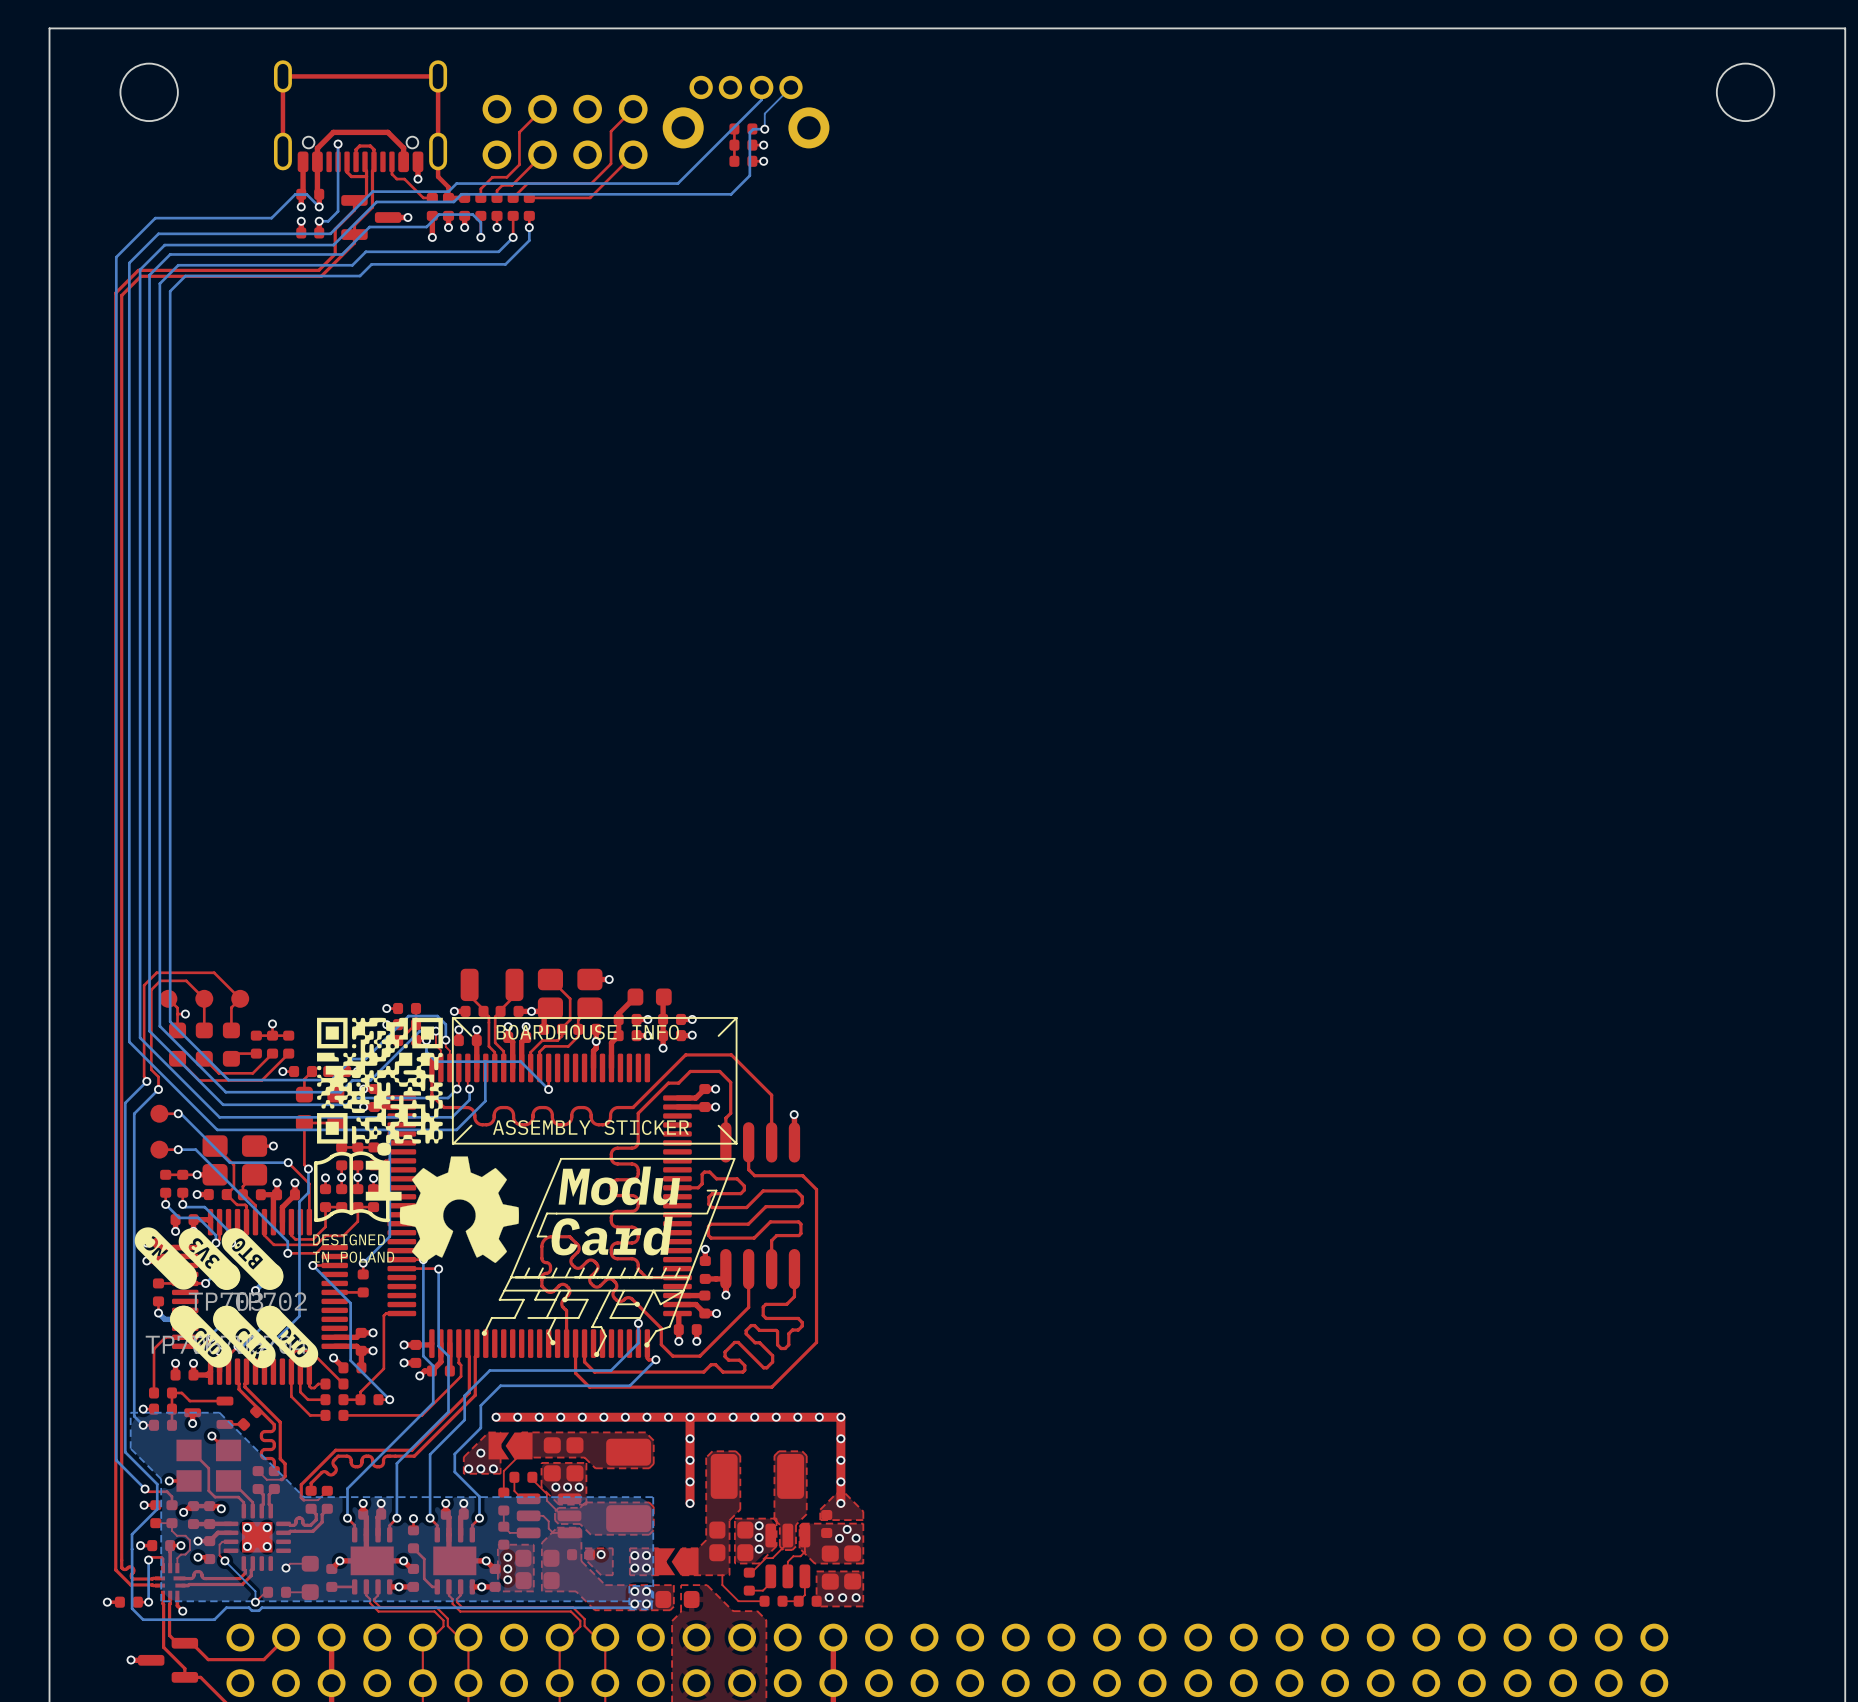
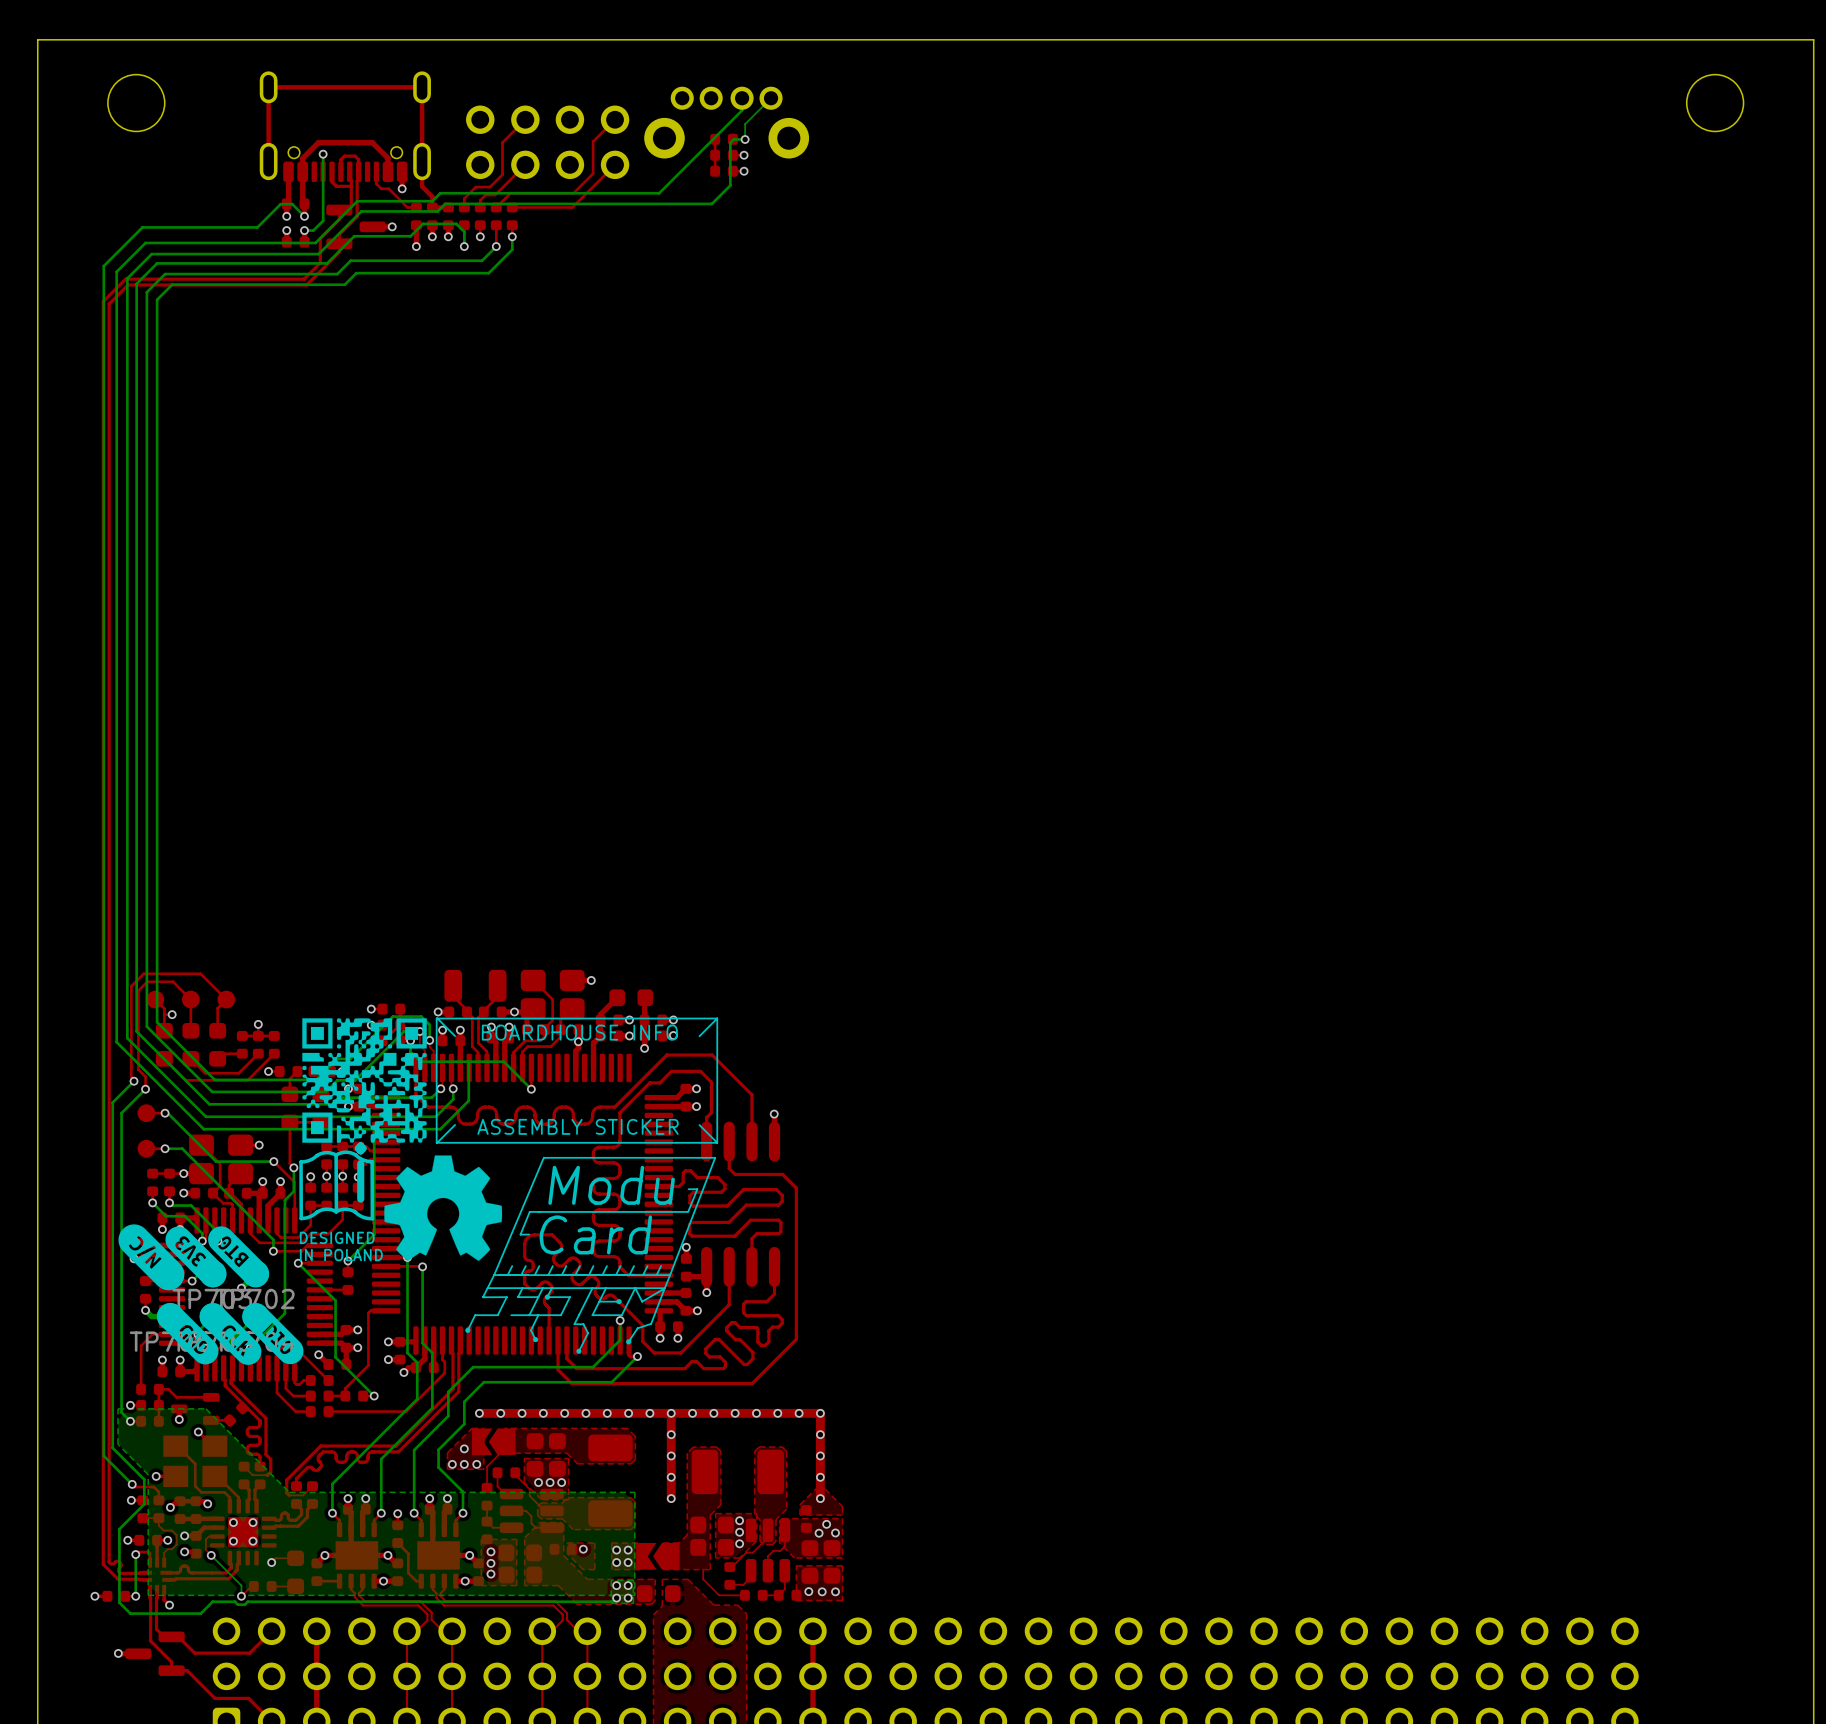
drawing shape: [134, 1227, 198, 1290] -> [118, 1224, 185, 1291]

